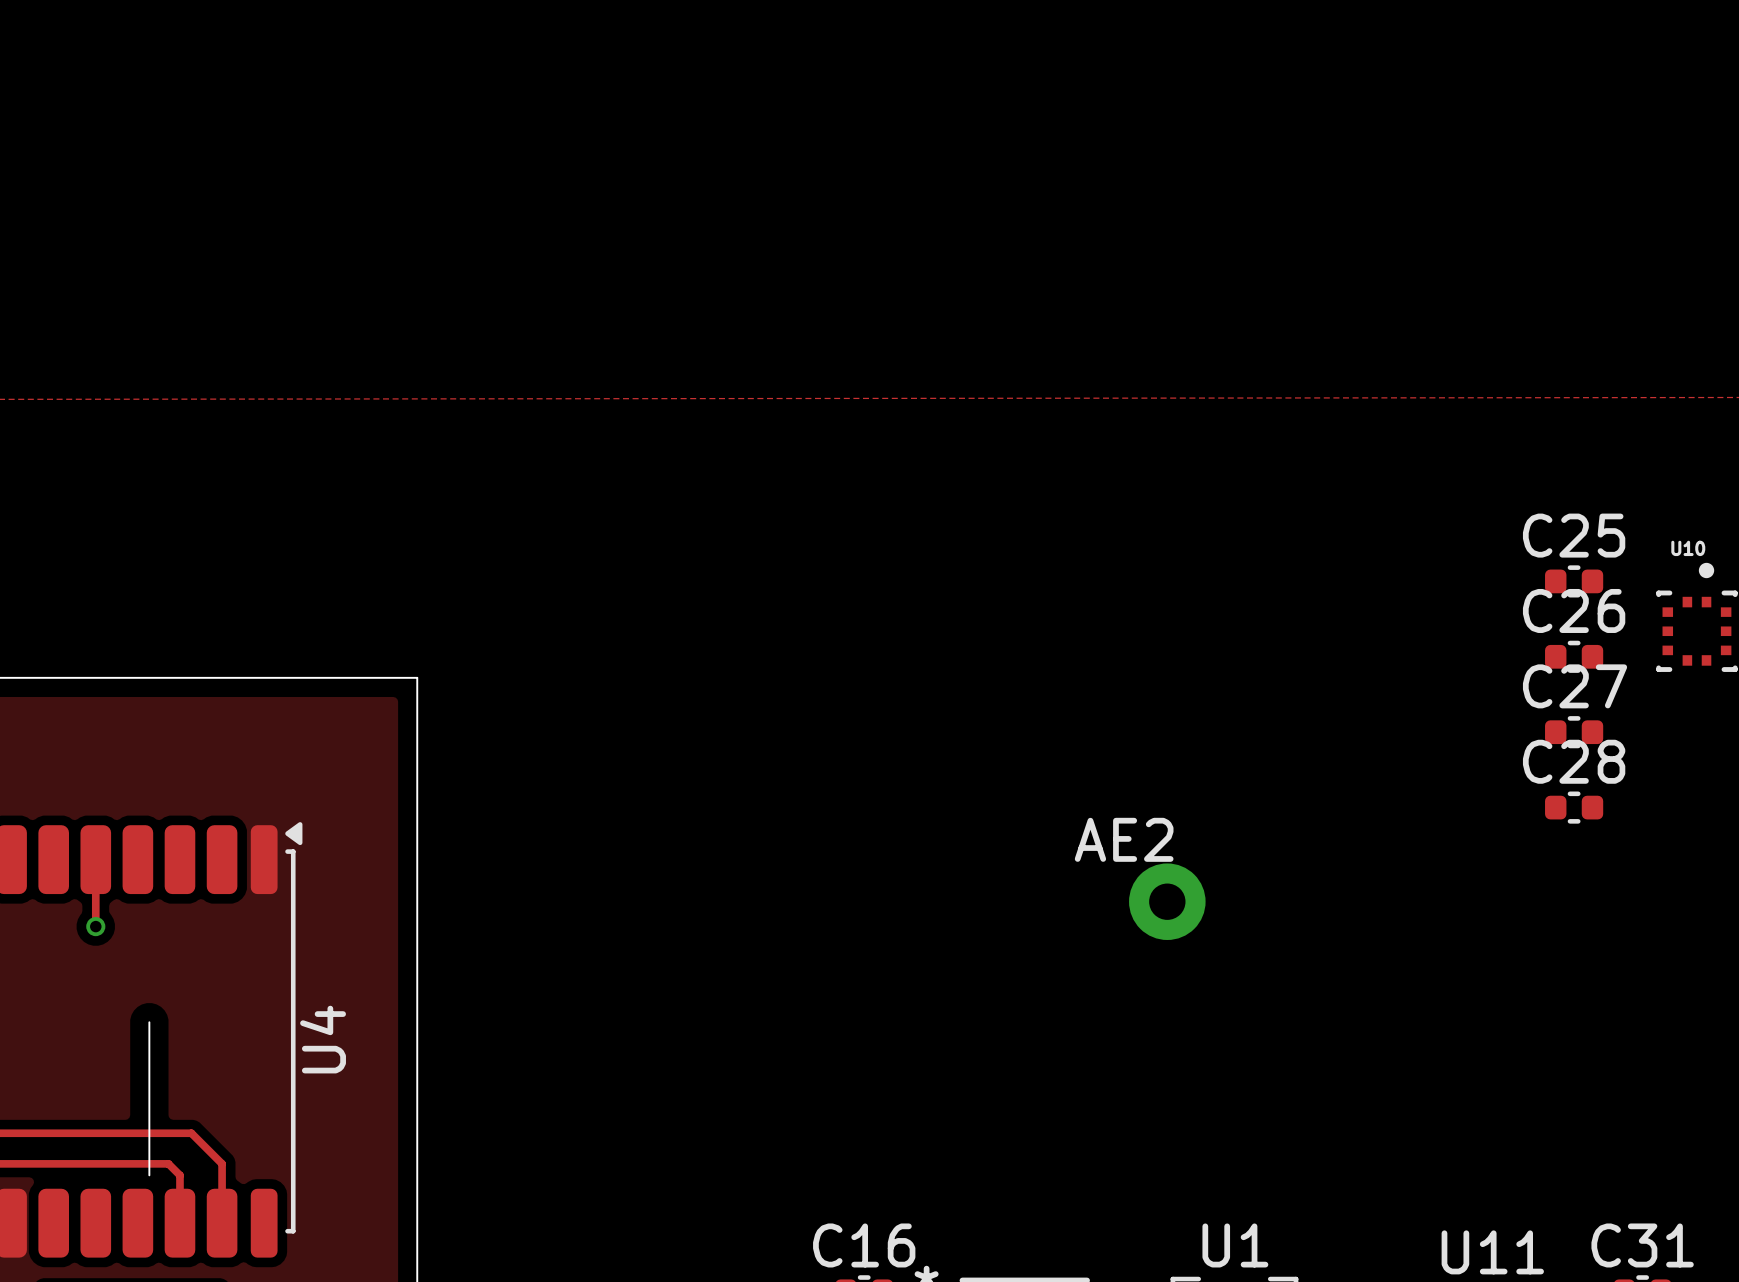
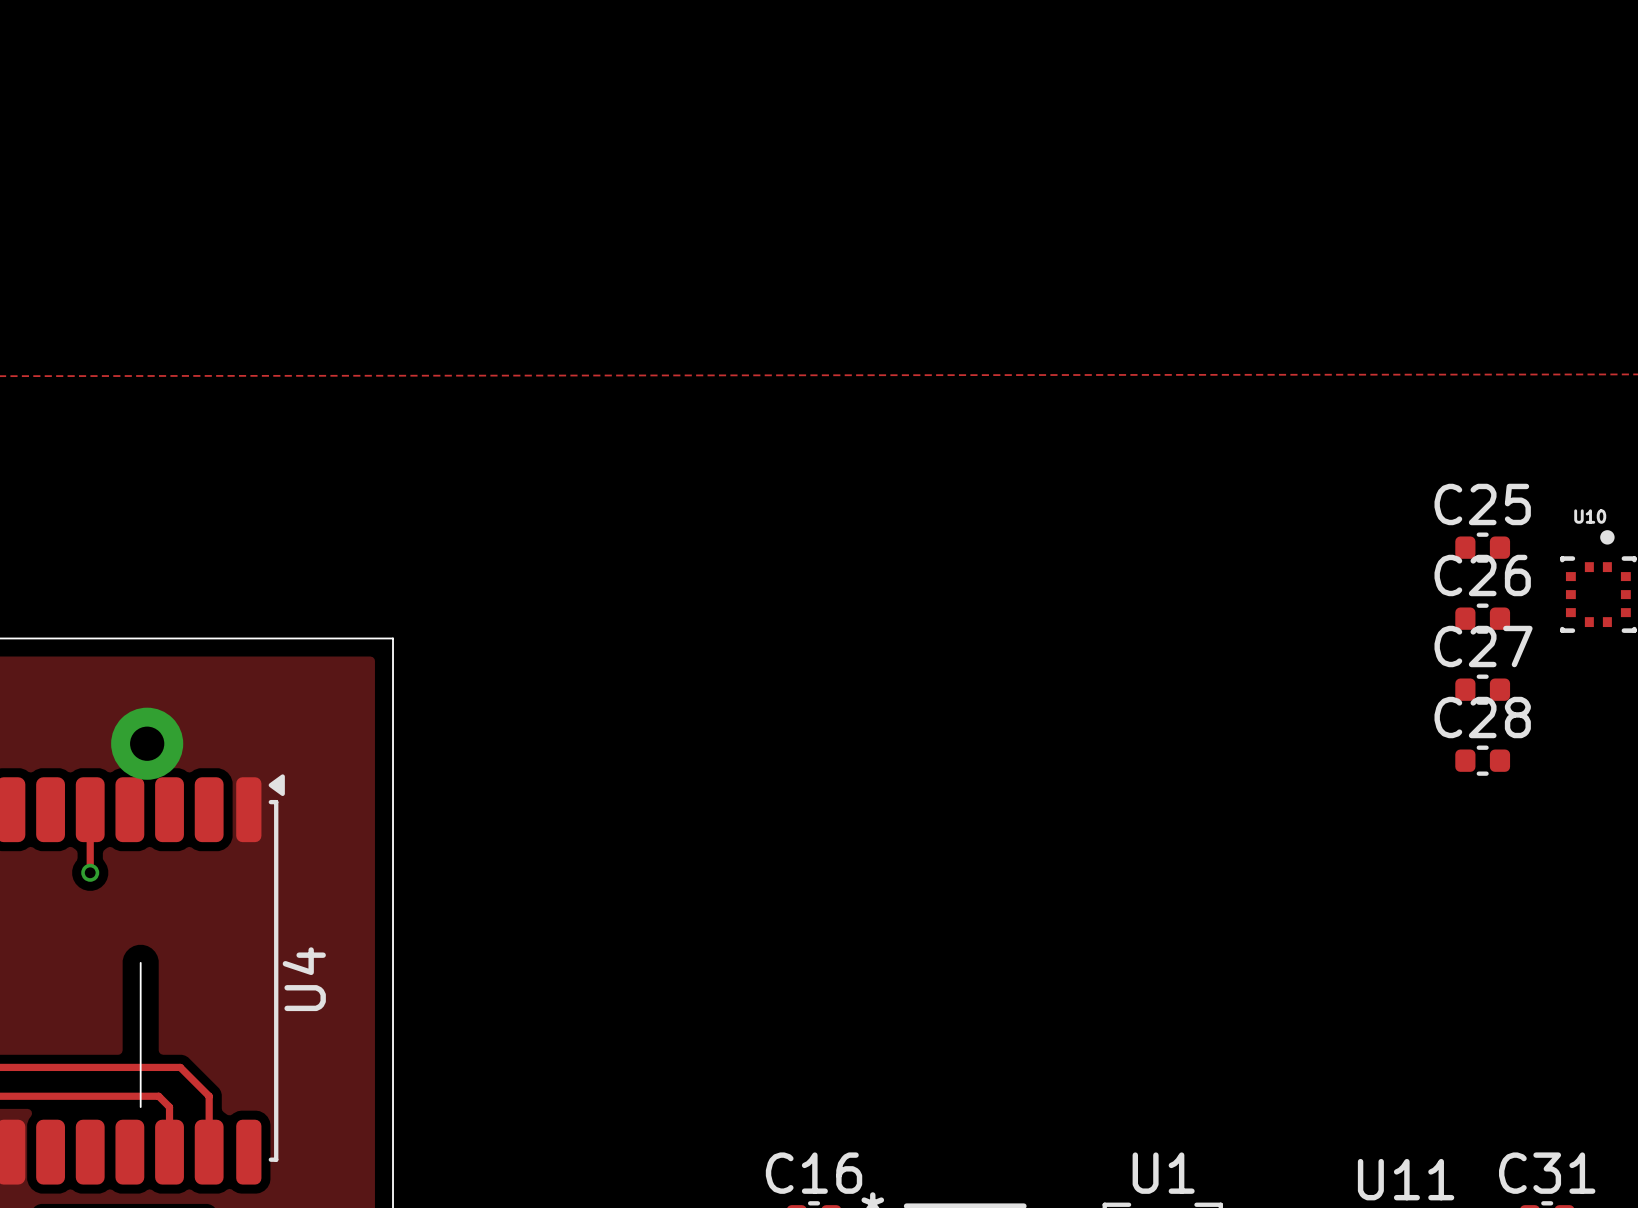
part: none -> (147, 743)
AE2: (1167, 901) -> none

